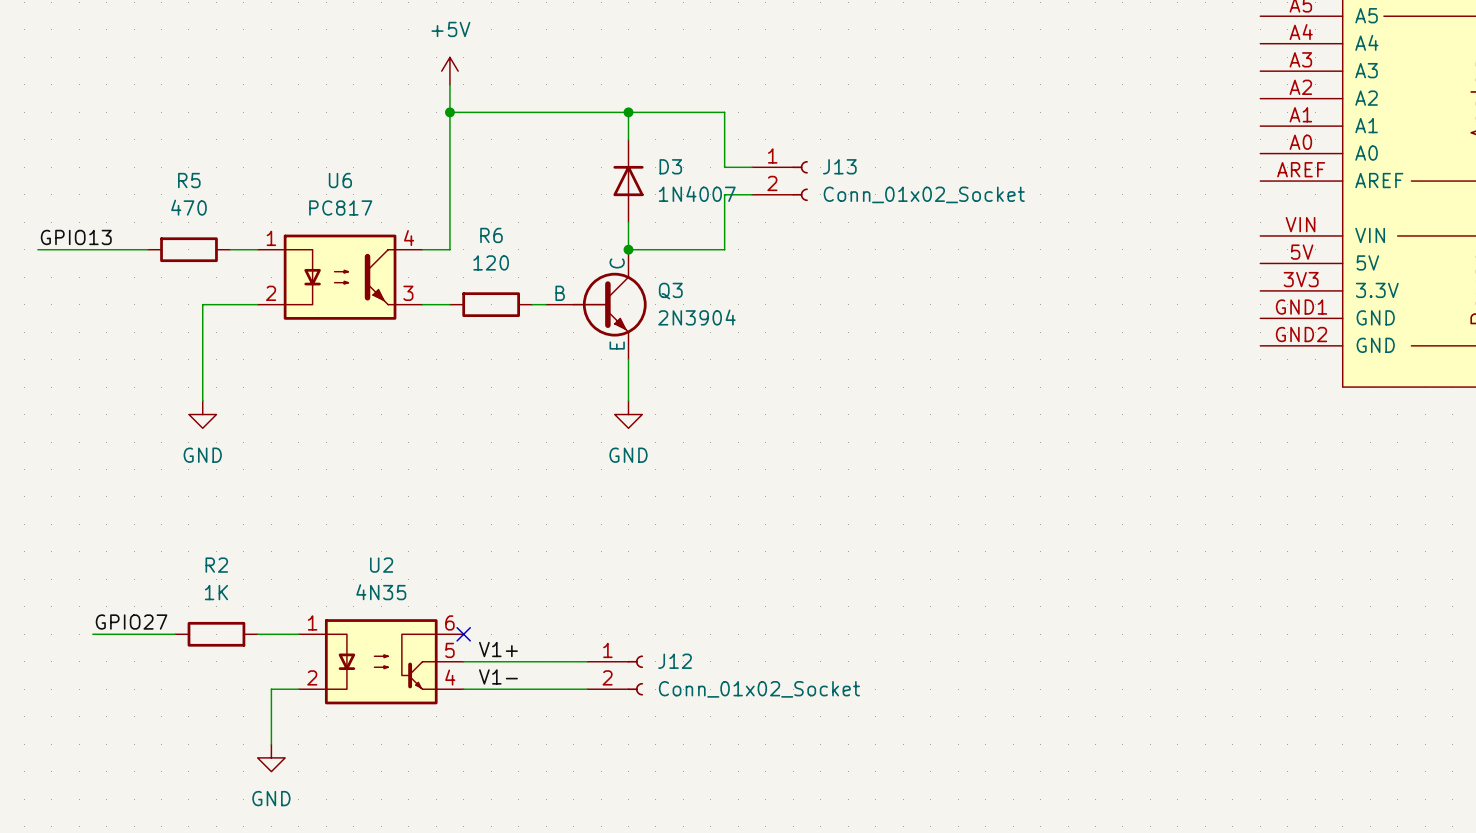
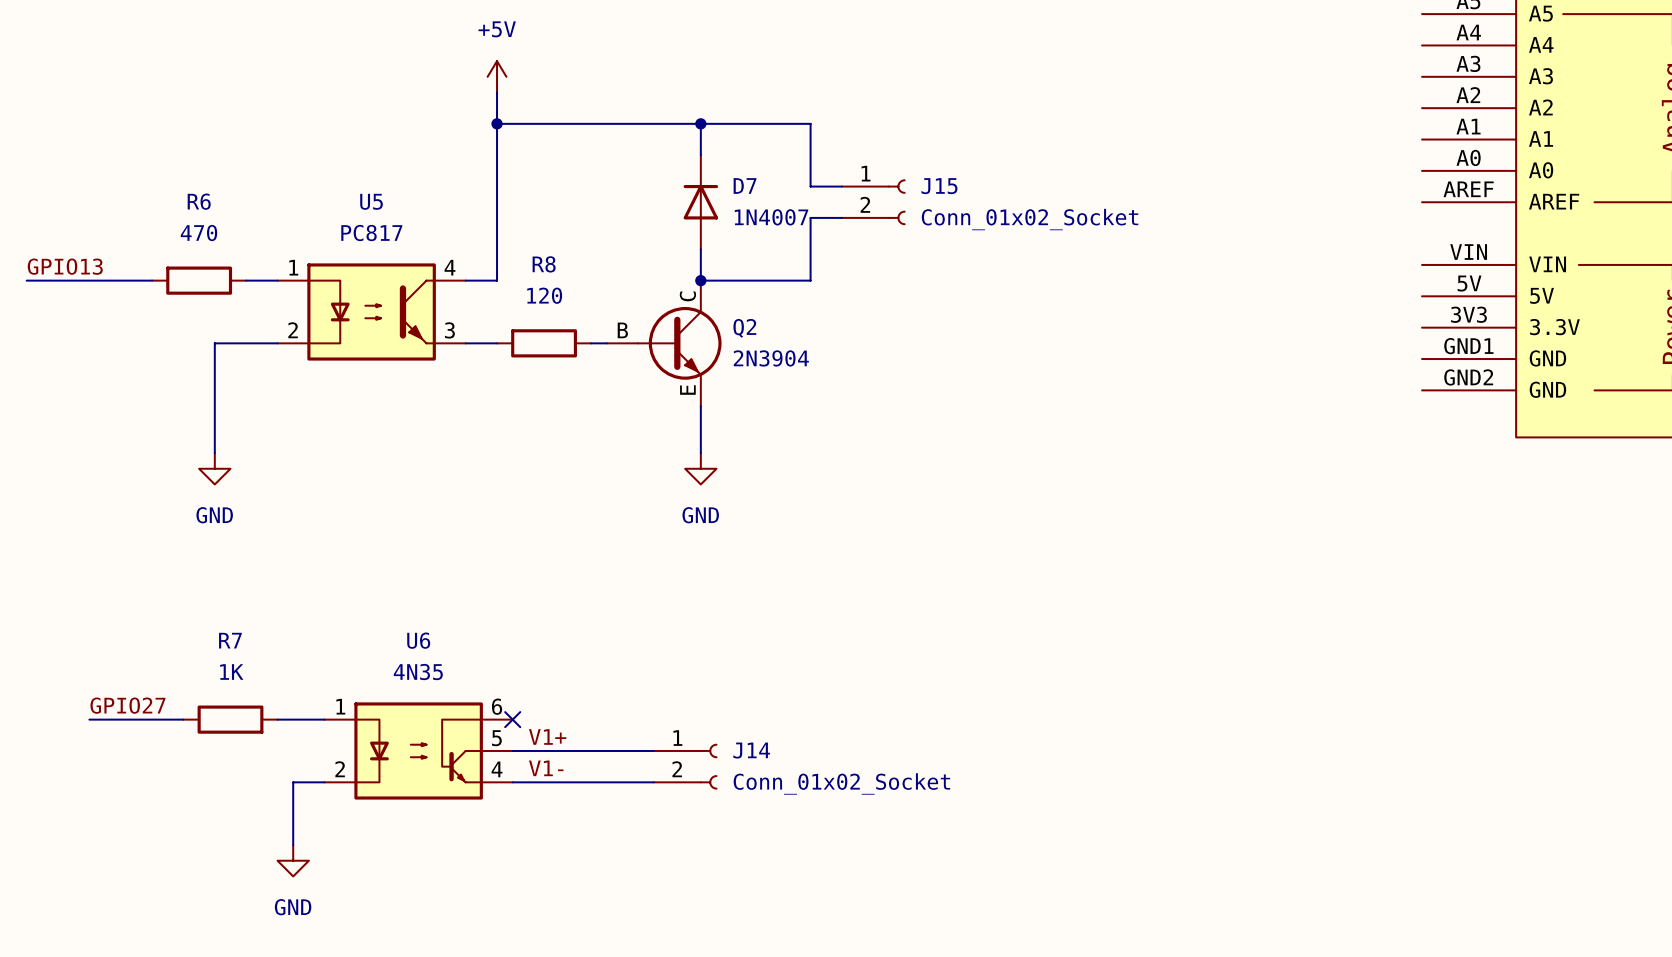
D3 name: D3 (670, 166) -> D7 (745, 185)
J13 name: J13 (839, 166) -> J15 (939, 186)
R5 name: R5 (189, 180) -> R6 (199, 201)
U6 name: U6 (340, 180) -> U5 (371, 201)
R6 name: R6 (491, 235) -> R8 (544, 264)
Q3 name: Q3 (670, 291) -> Q2 (744, 328)
R2 name: R2 (216, 565) -> R7 (230, 640)
U2 name: U2 (381, 565) -> U6 (418, 640)
J12 name: J12 (675, 661) -> J14 (751, 750)

